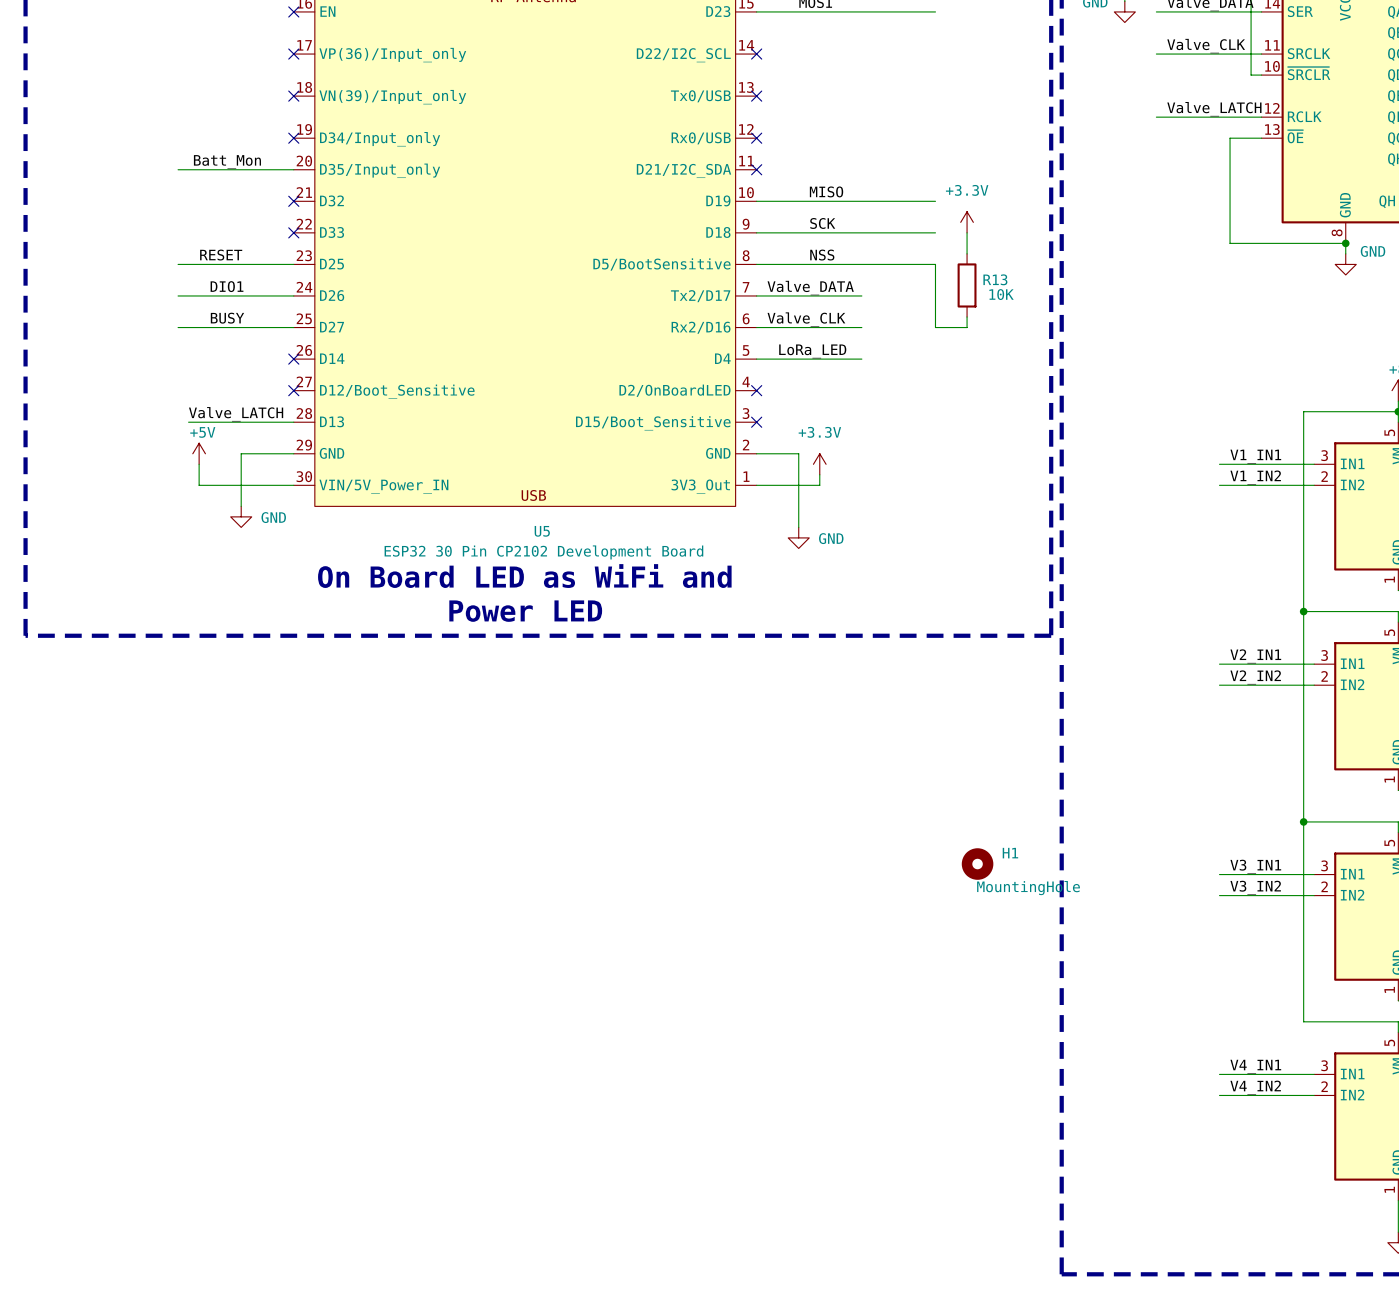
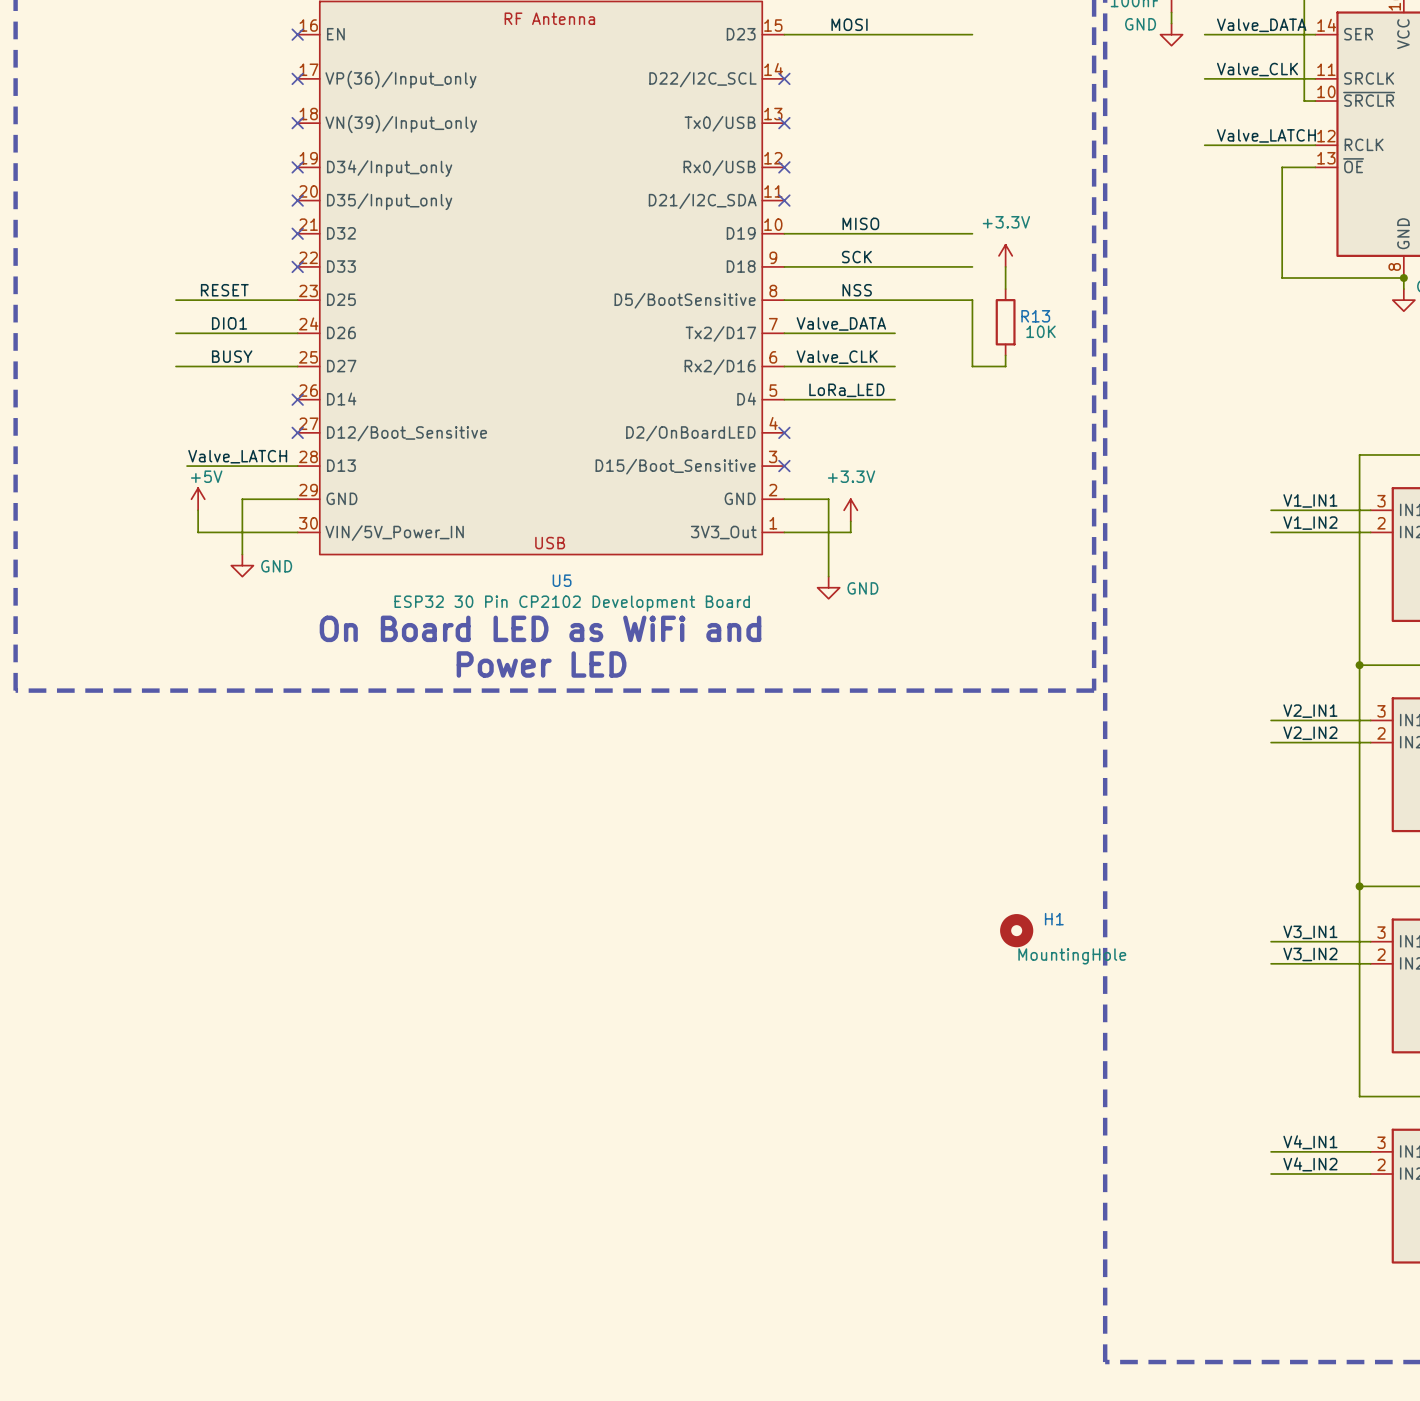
label: Batt_Mon (227, 162) -> none
wire: (178, 169) (293, 169) -> none
no-connect mark: none -> (297, 200)

